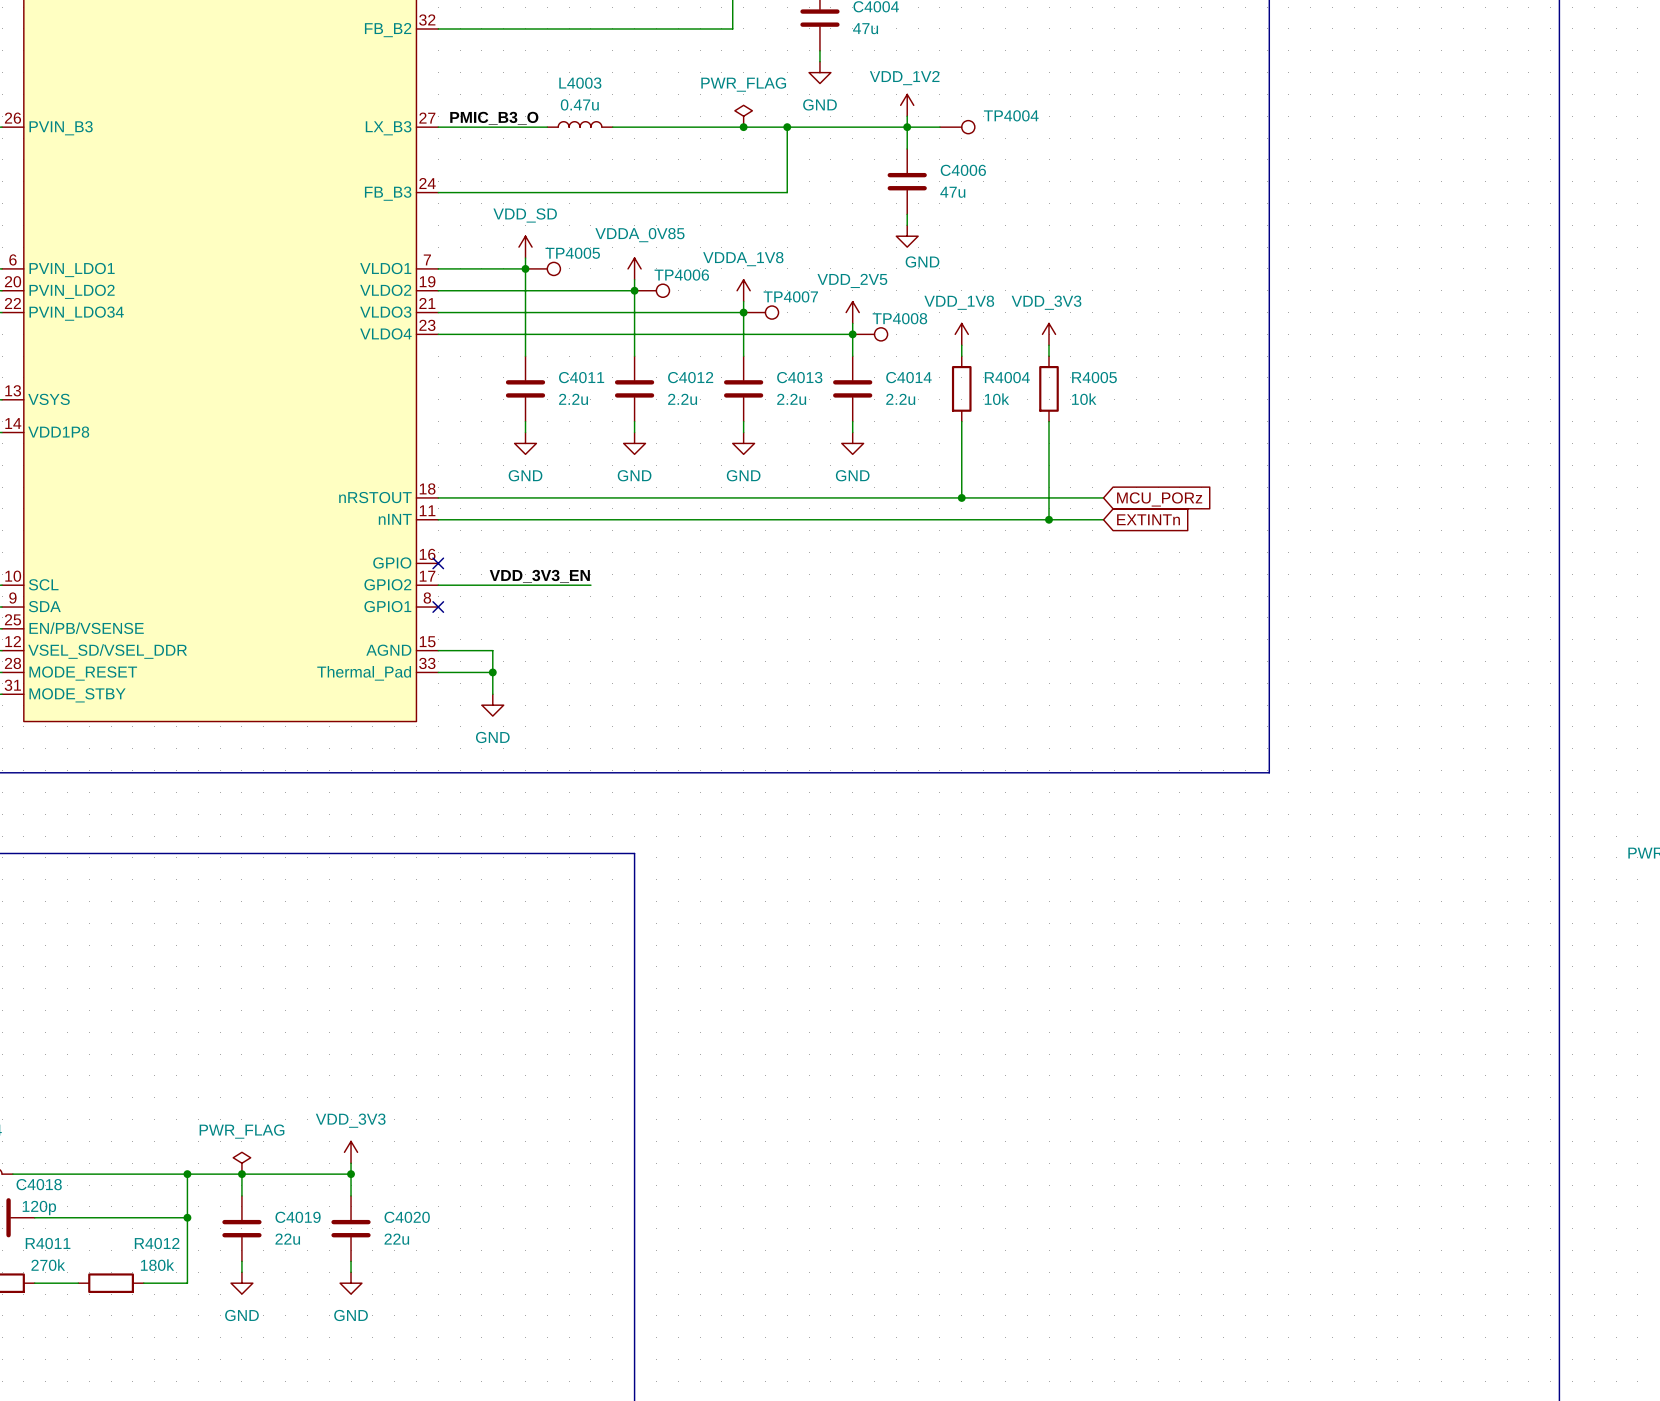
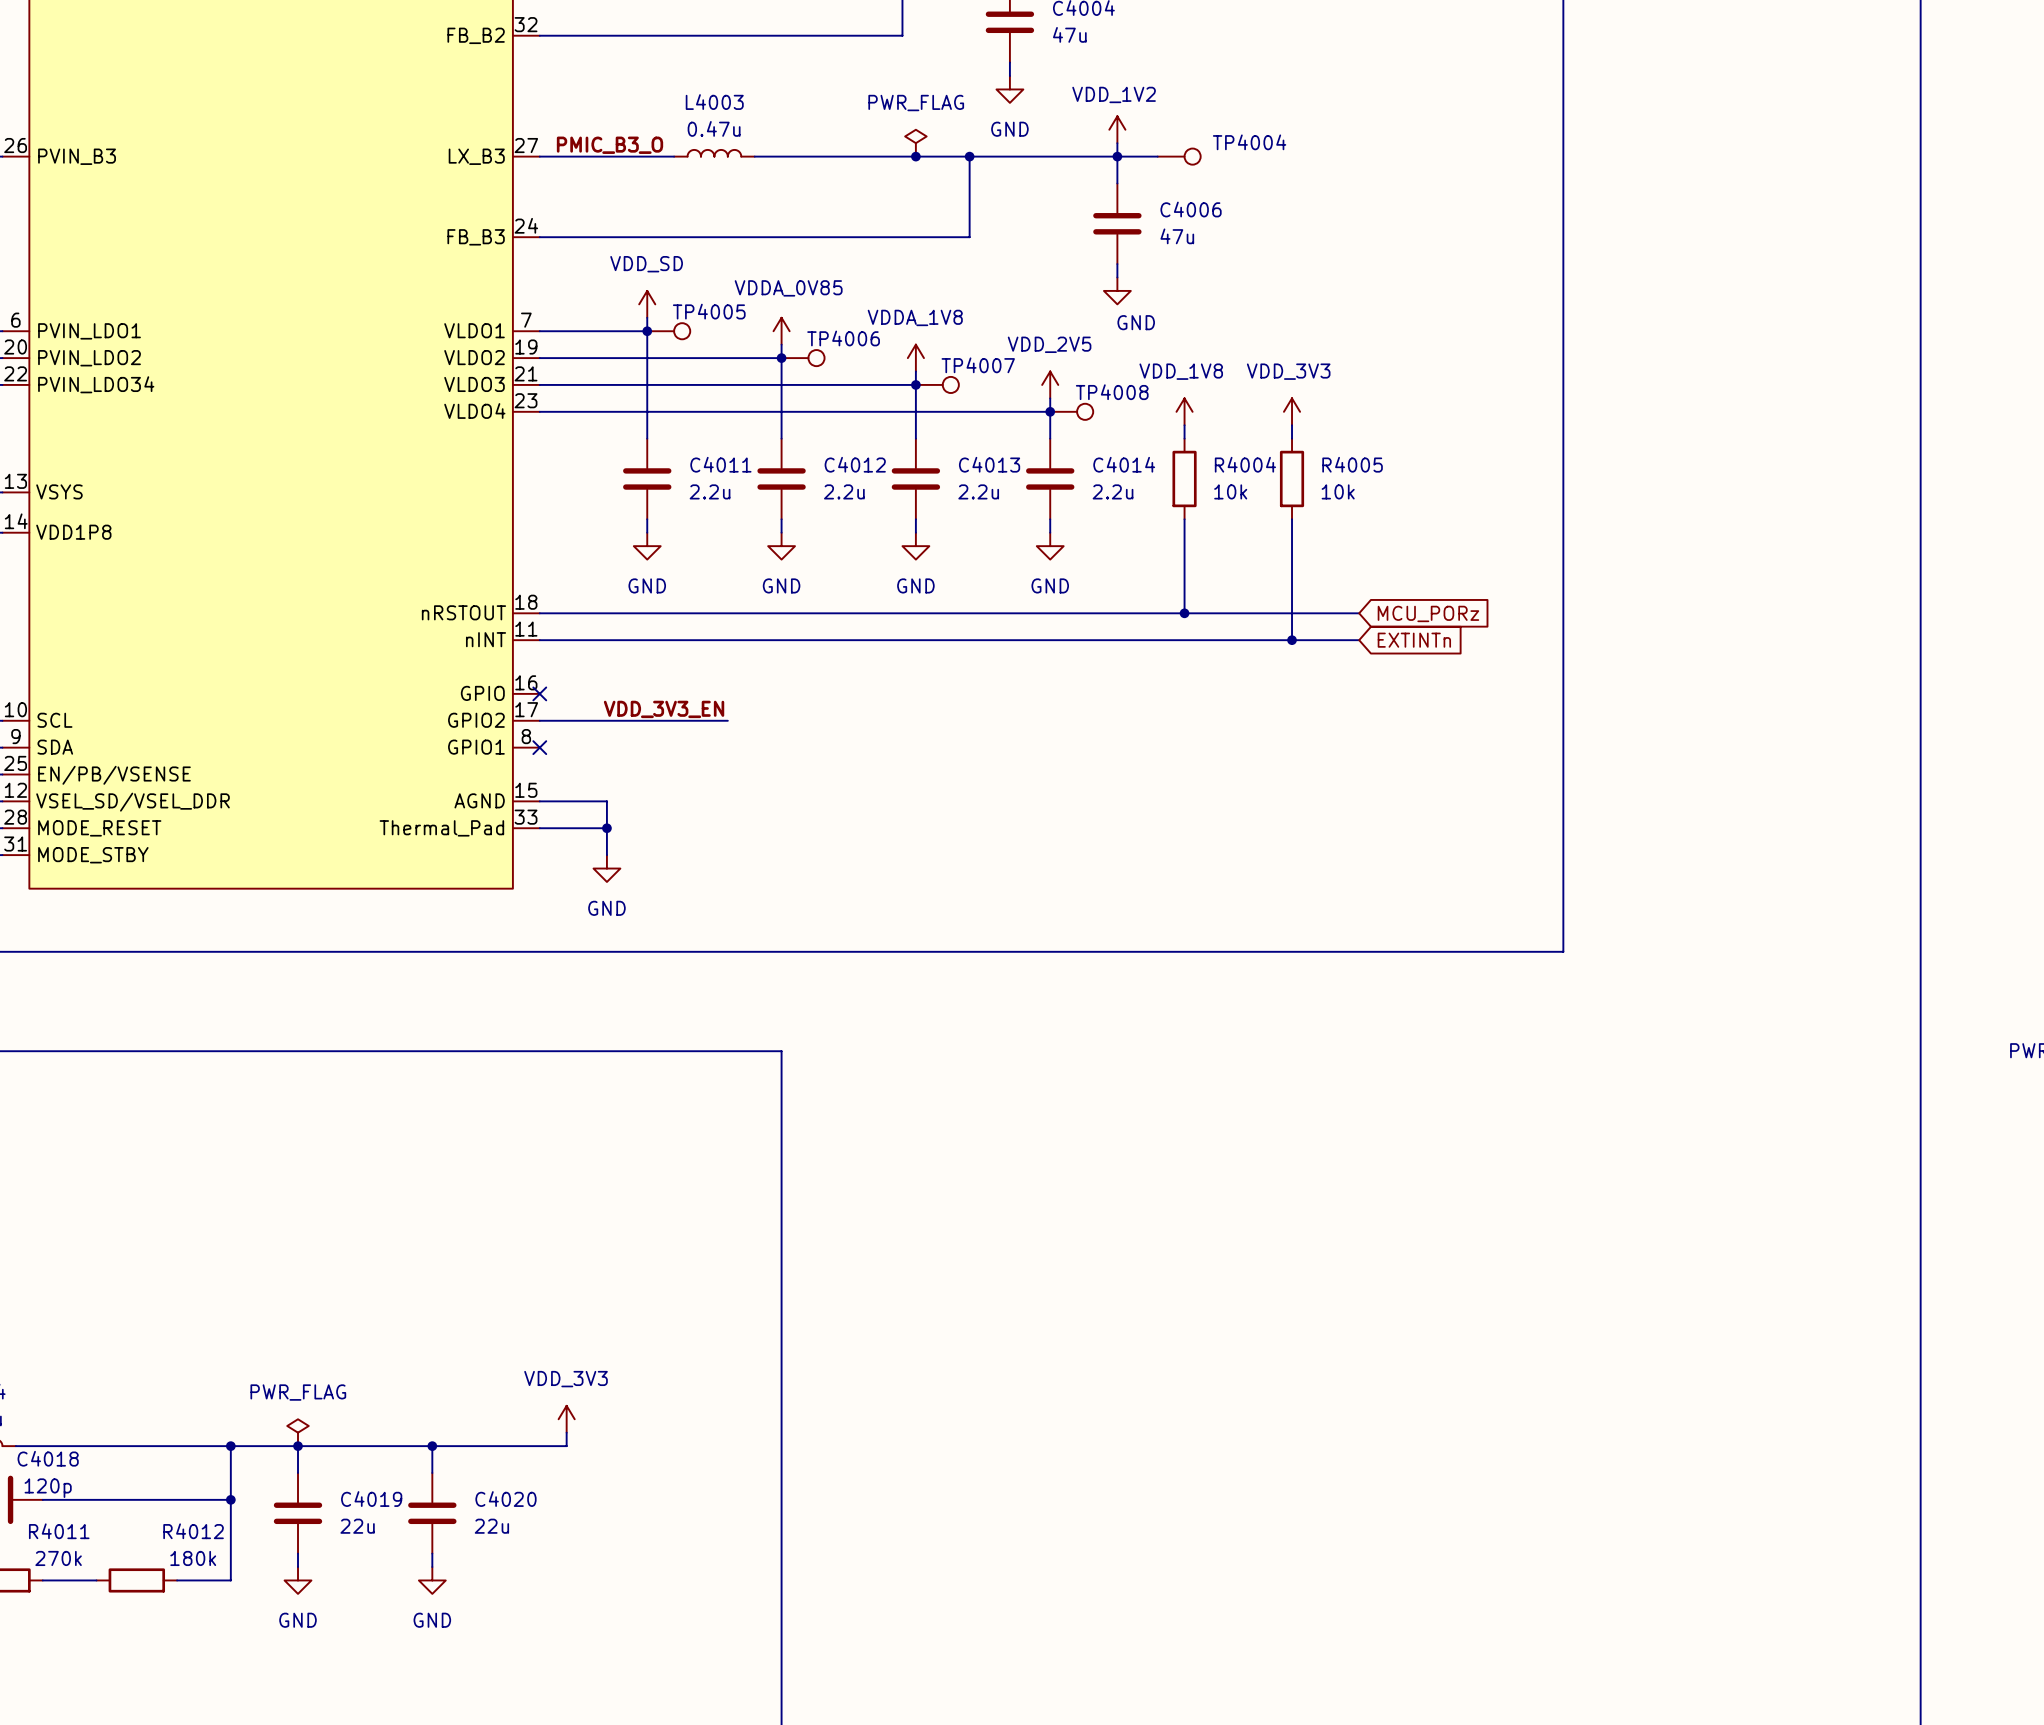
power symbol position: VDD_3V3 (351, 1152) -> VDD_3V3 (566, 1419)
wire: (351, 1163) (351, 1174) -> (566, 1432) (566, 1446) (432, 1446)

